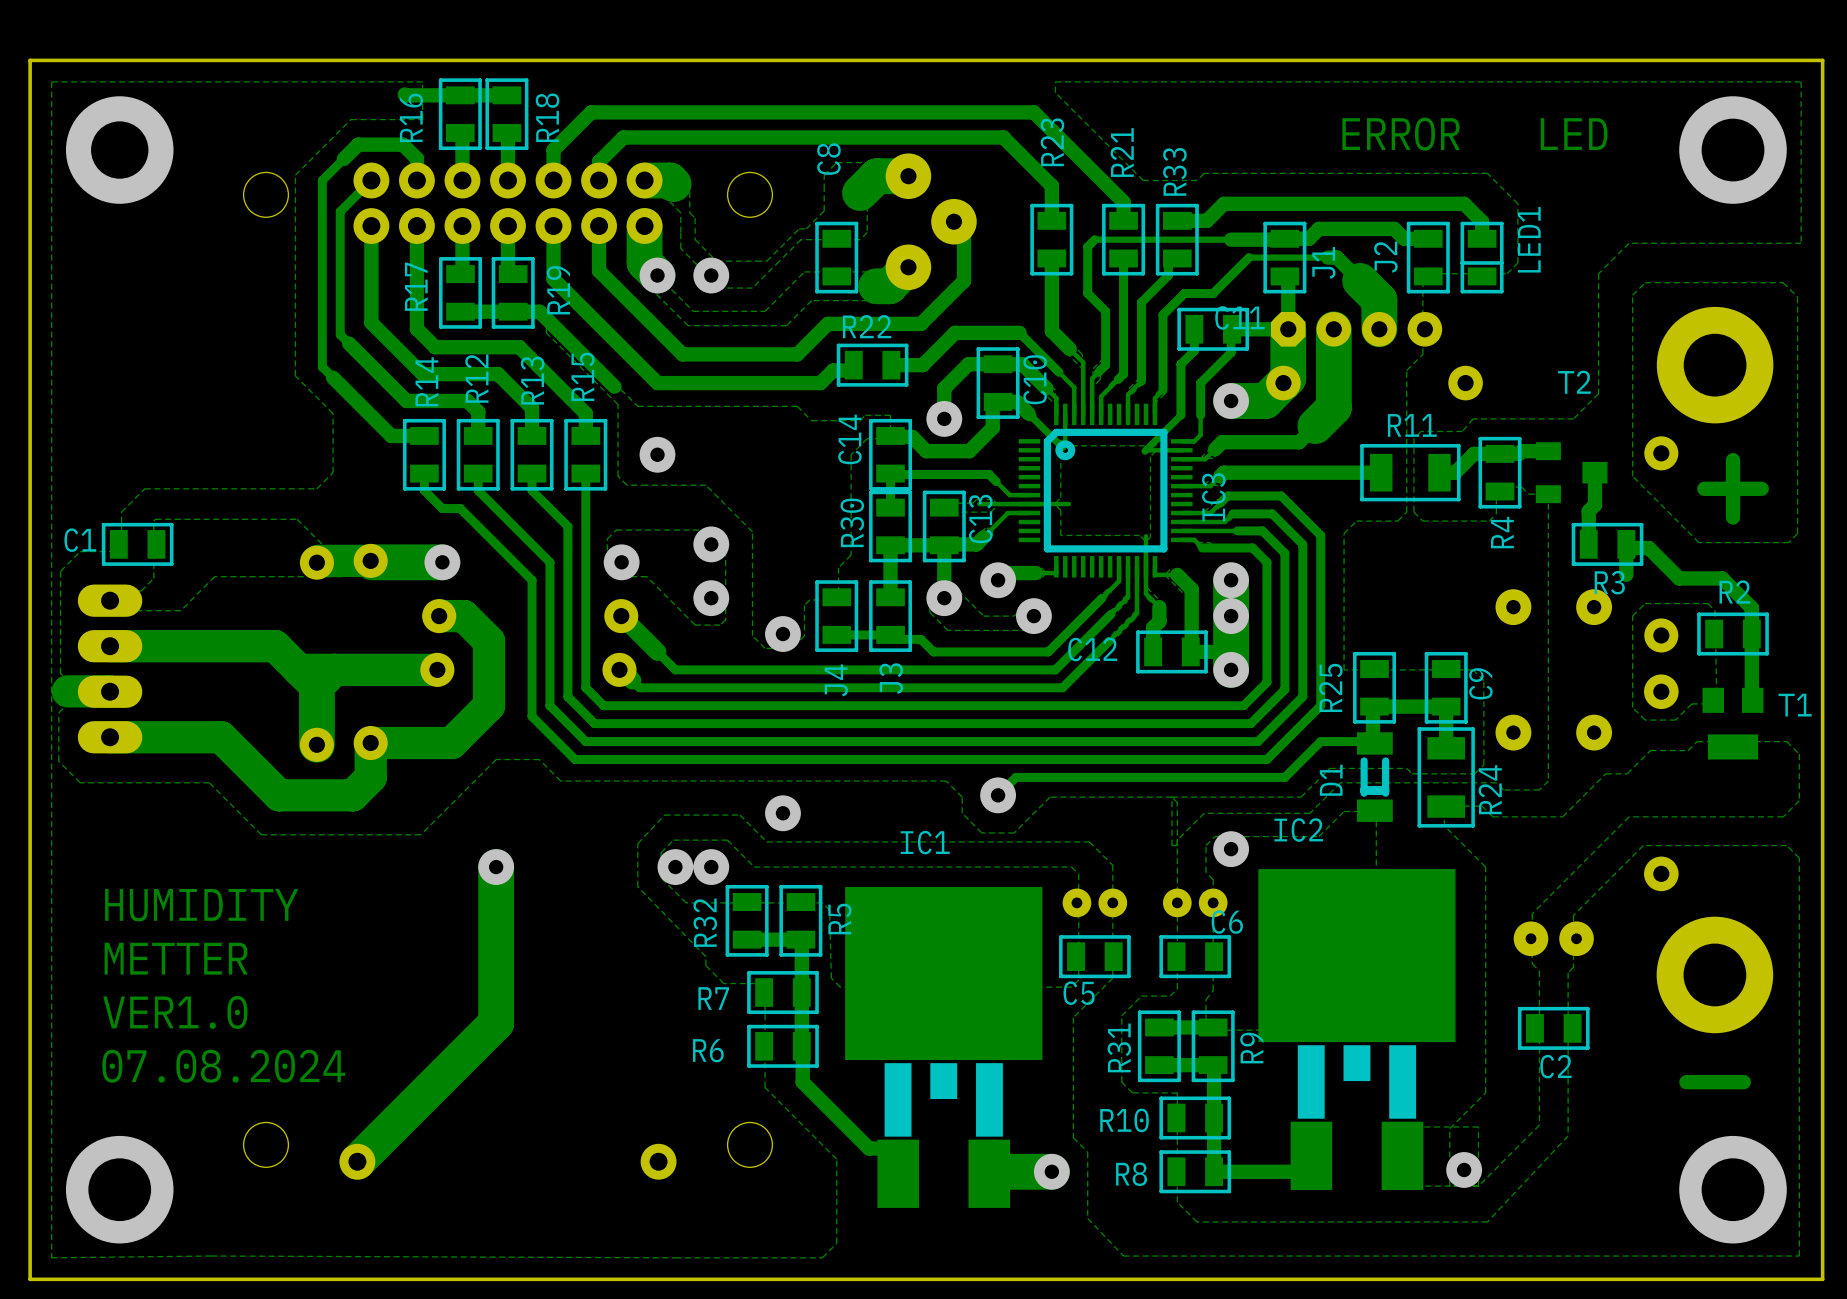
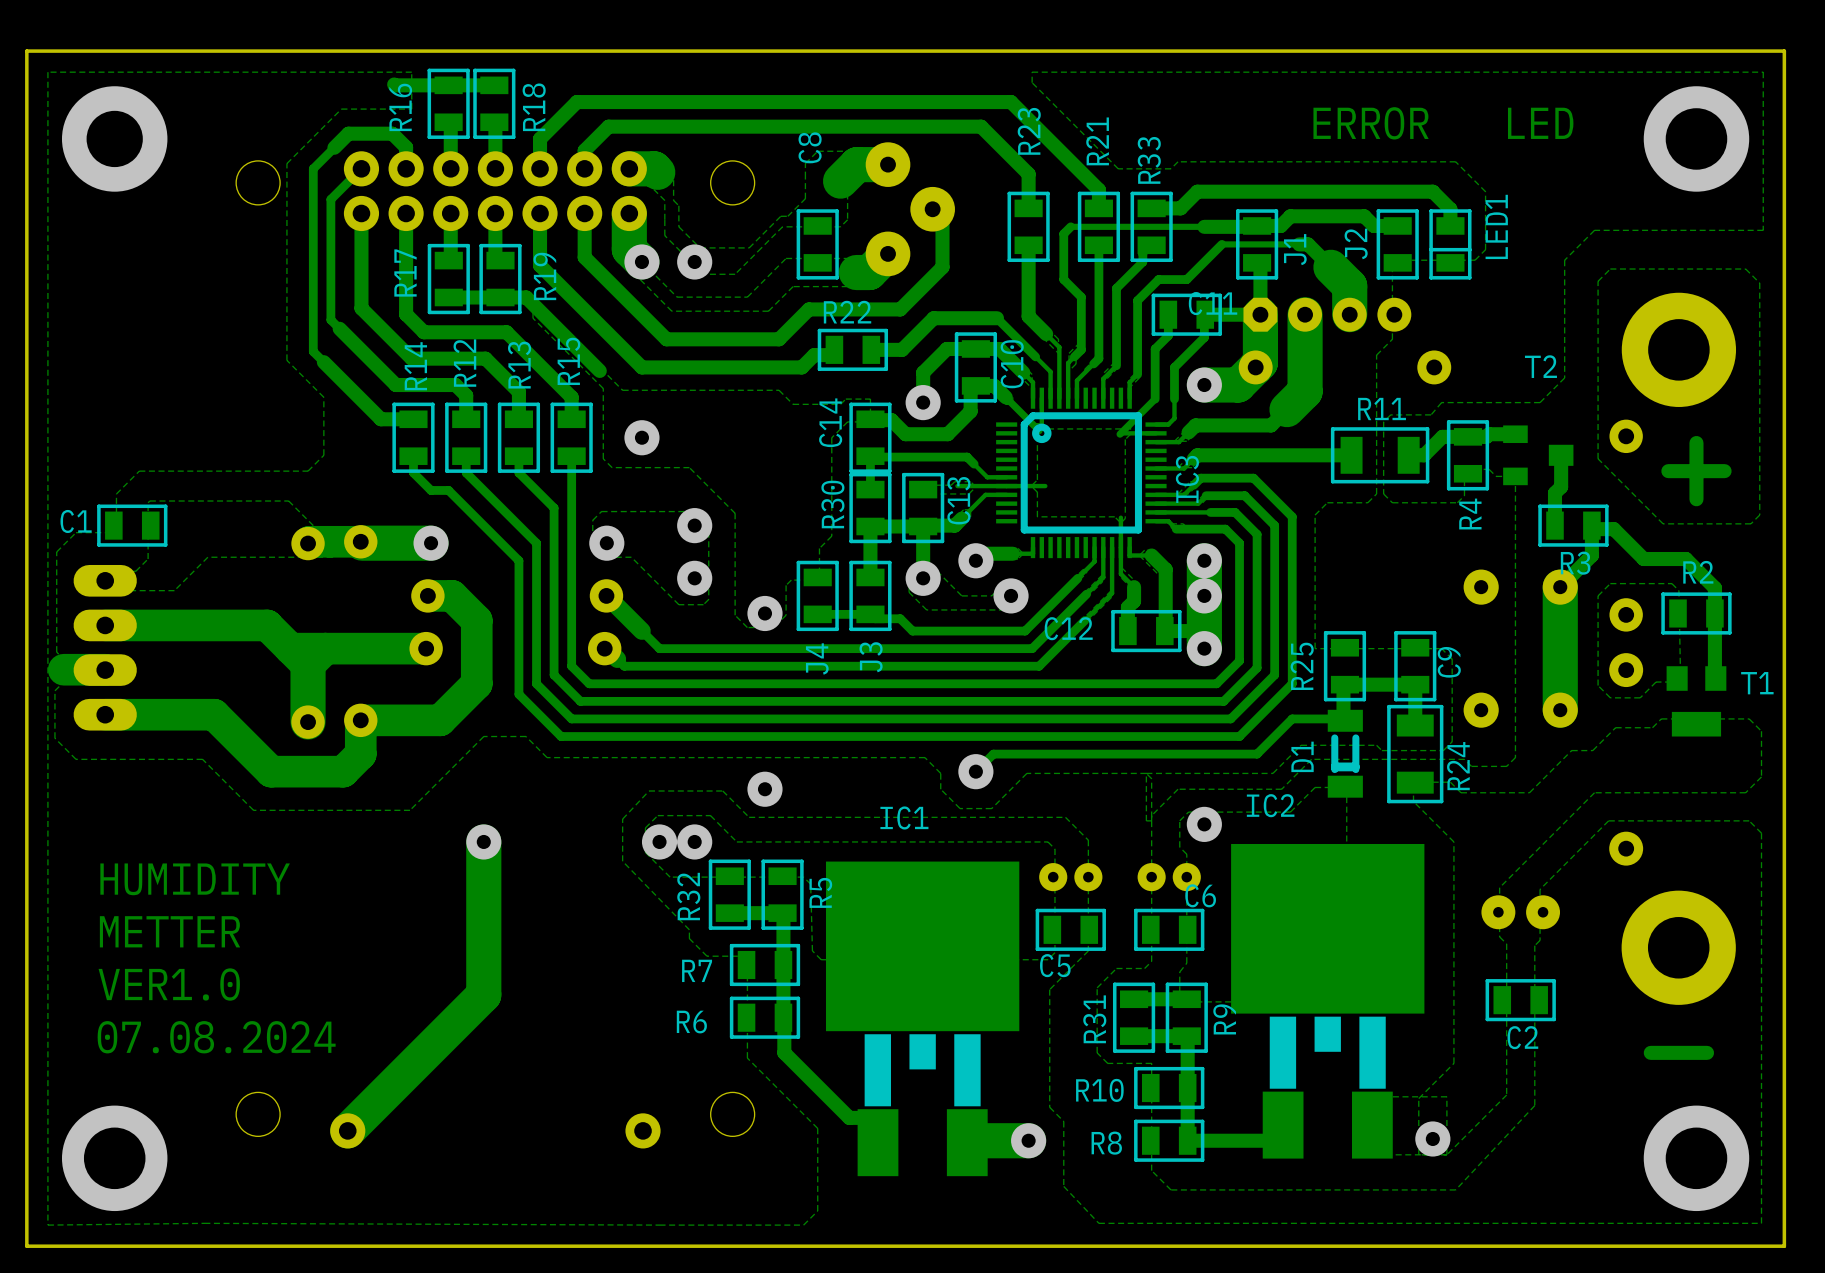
track: none -> (1591, 555) (1560, 587) (1560, 710)

